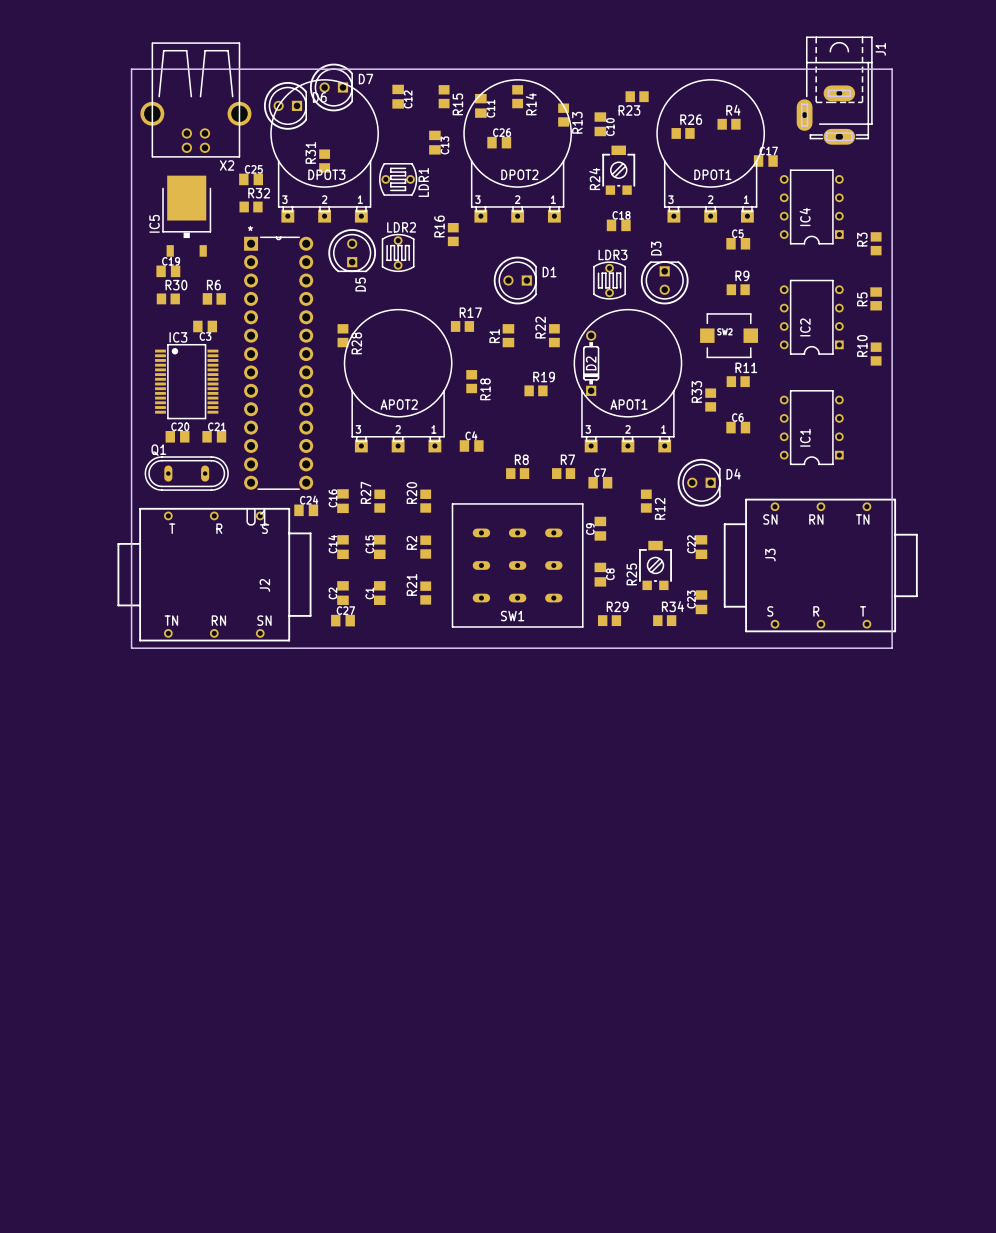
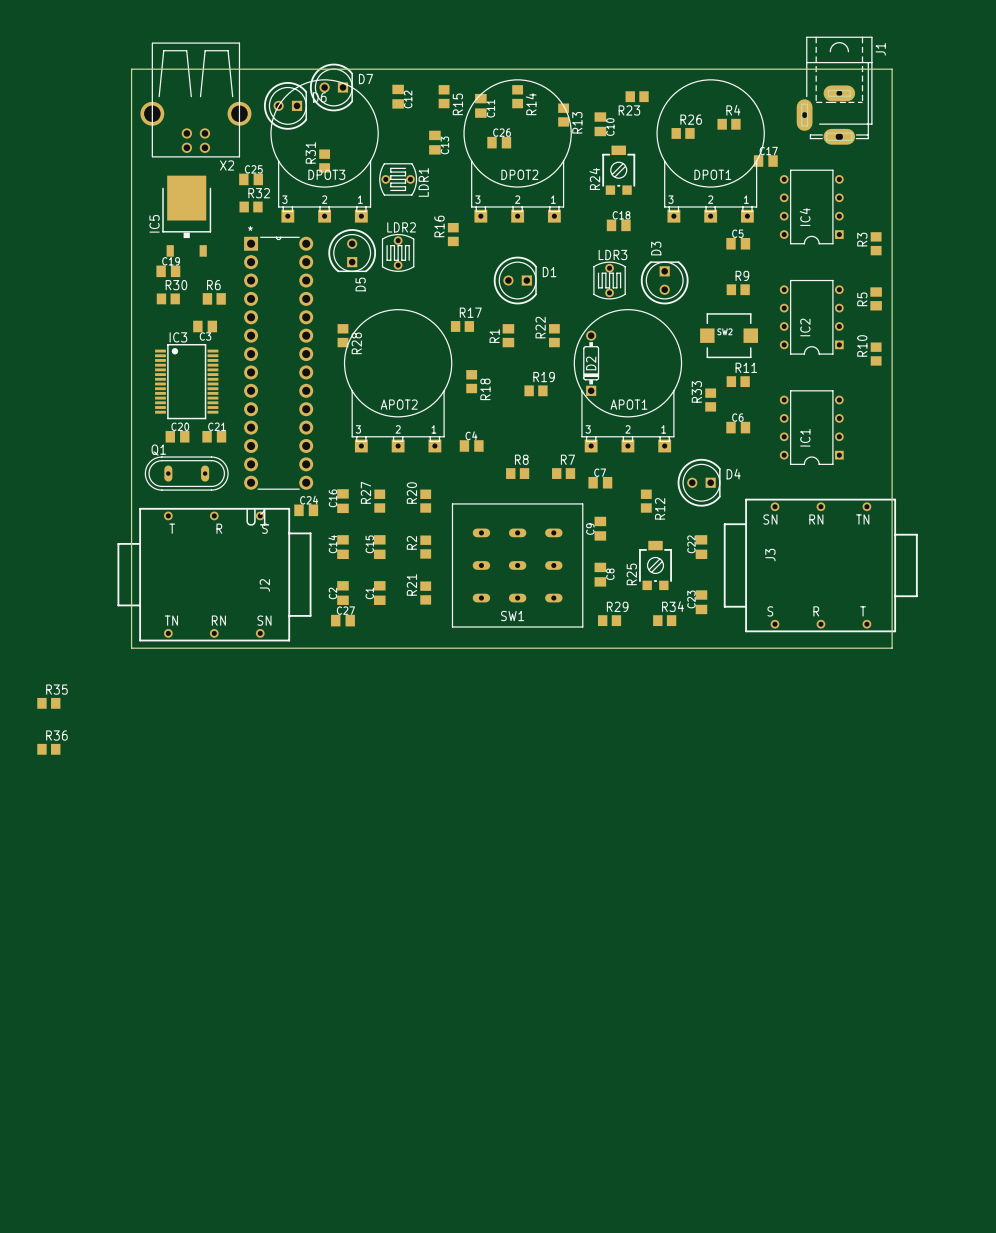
R35: none -> (48, 703)
R36: none -> (48, 749)

